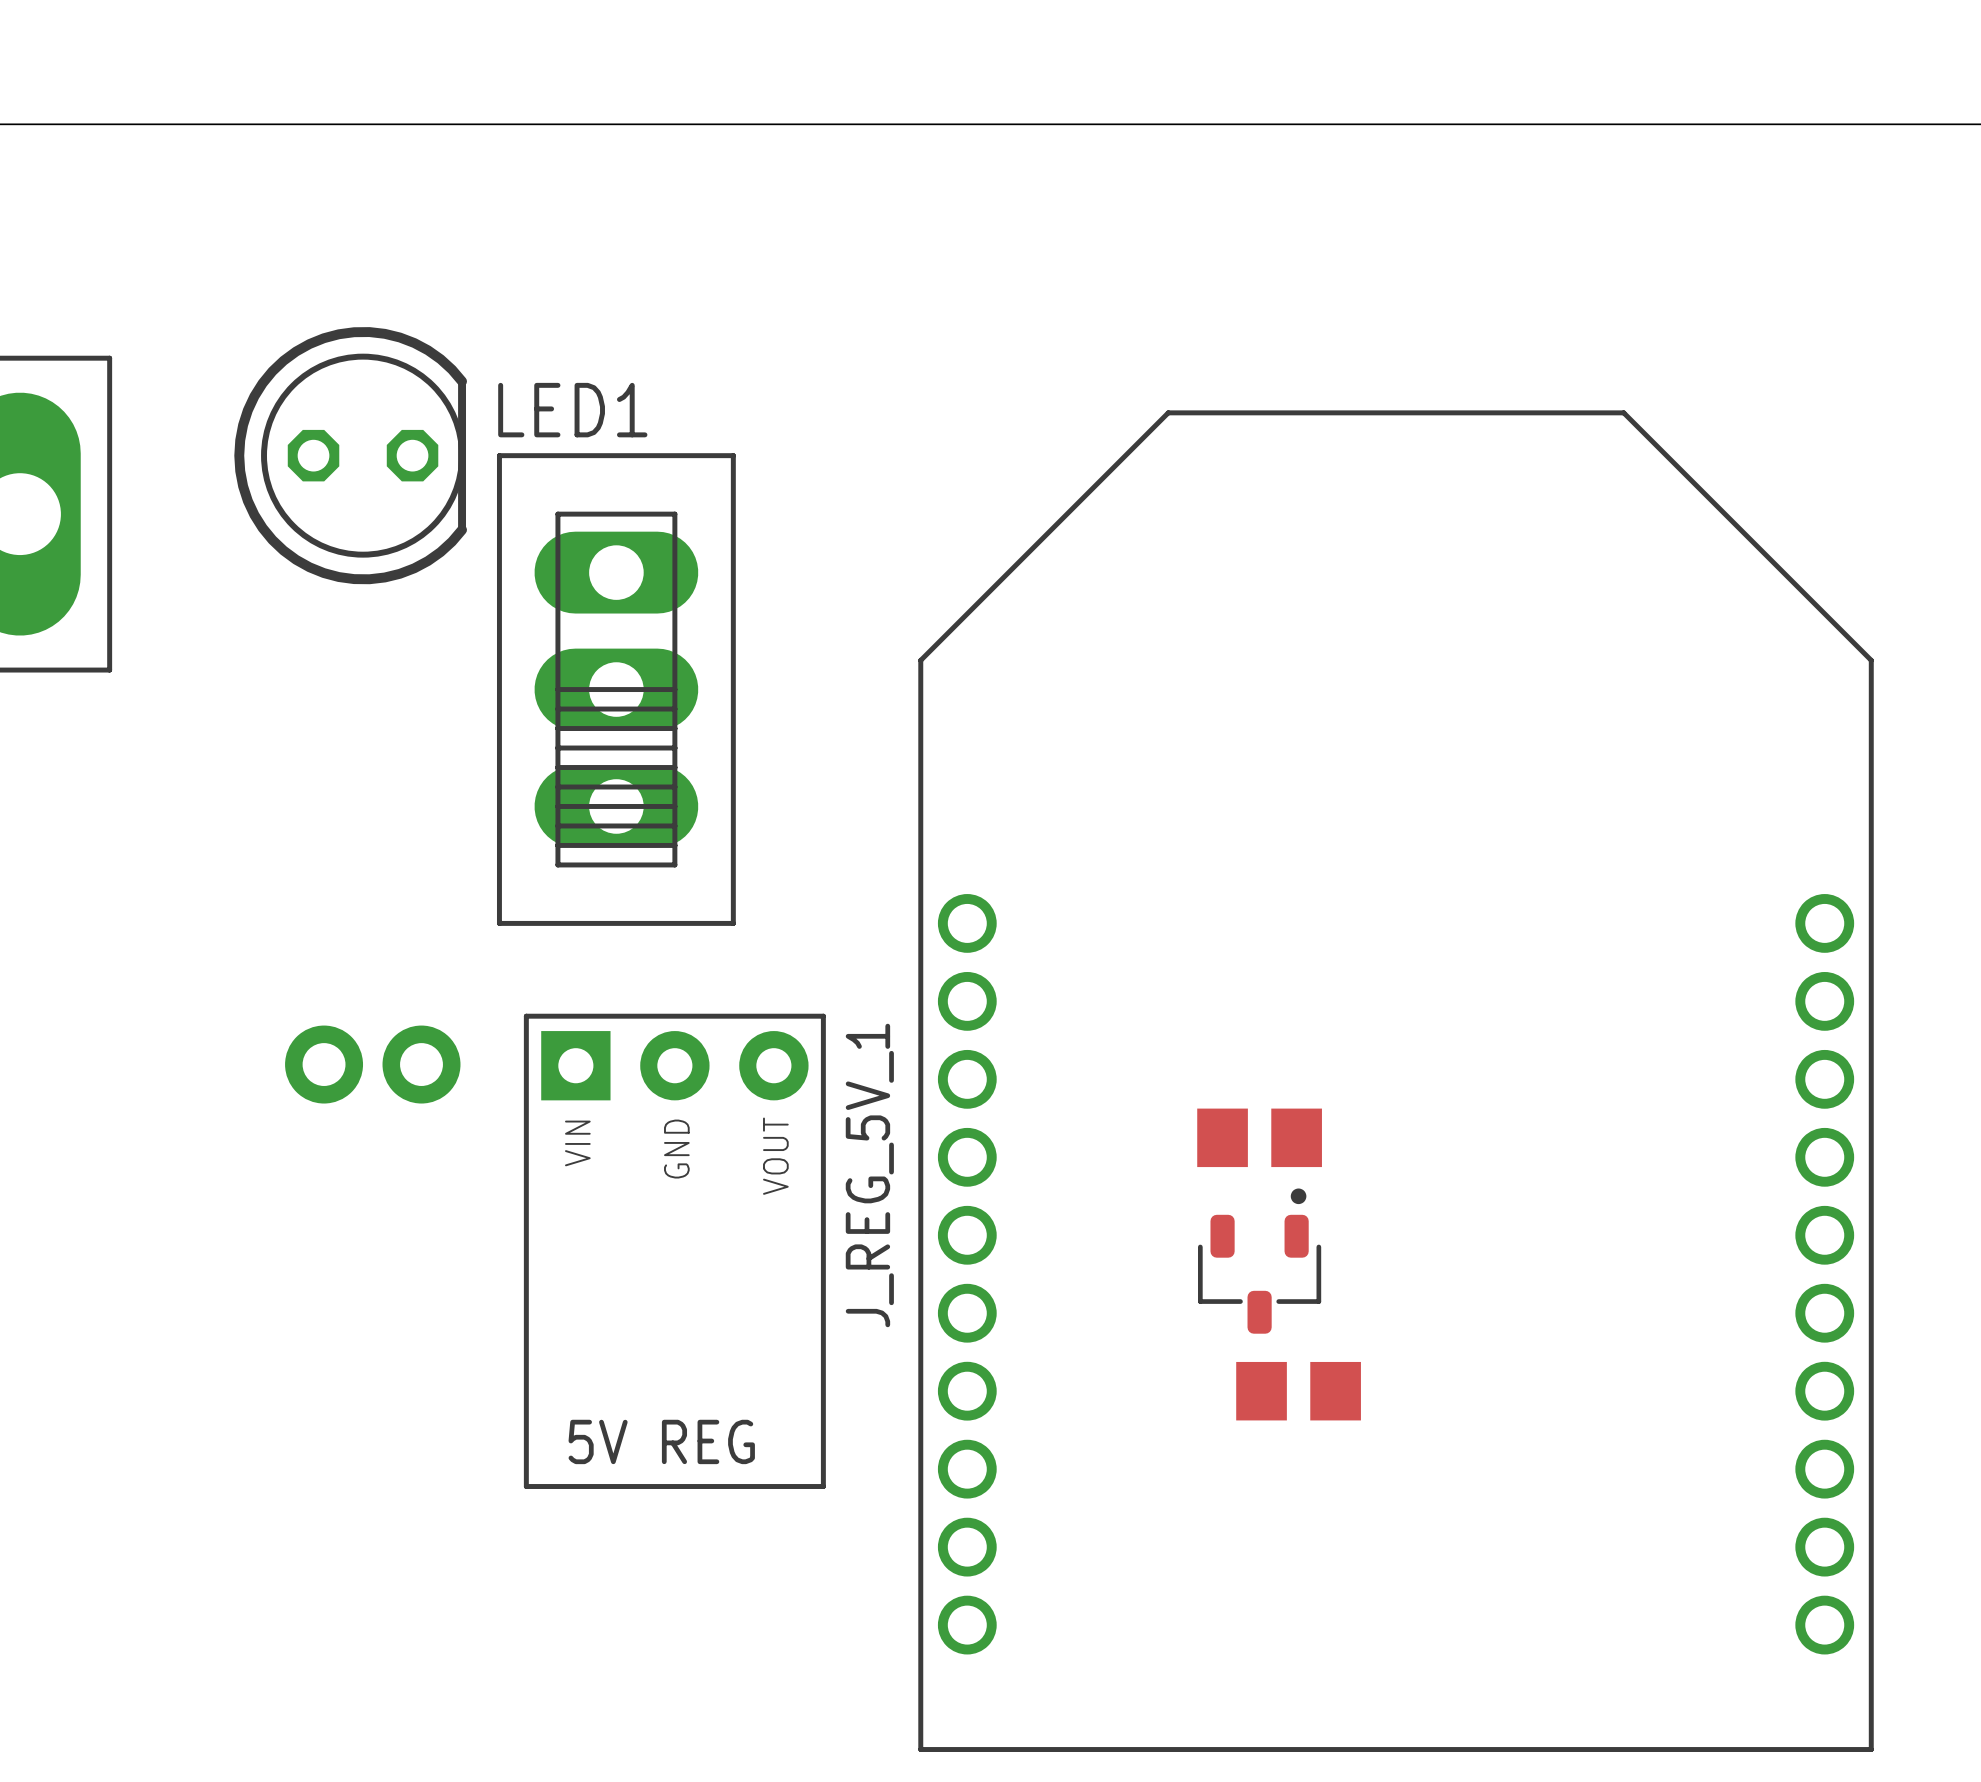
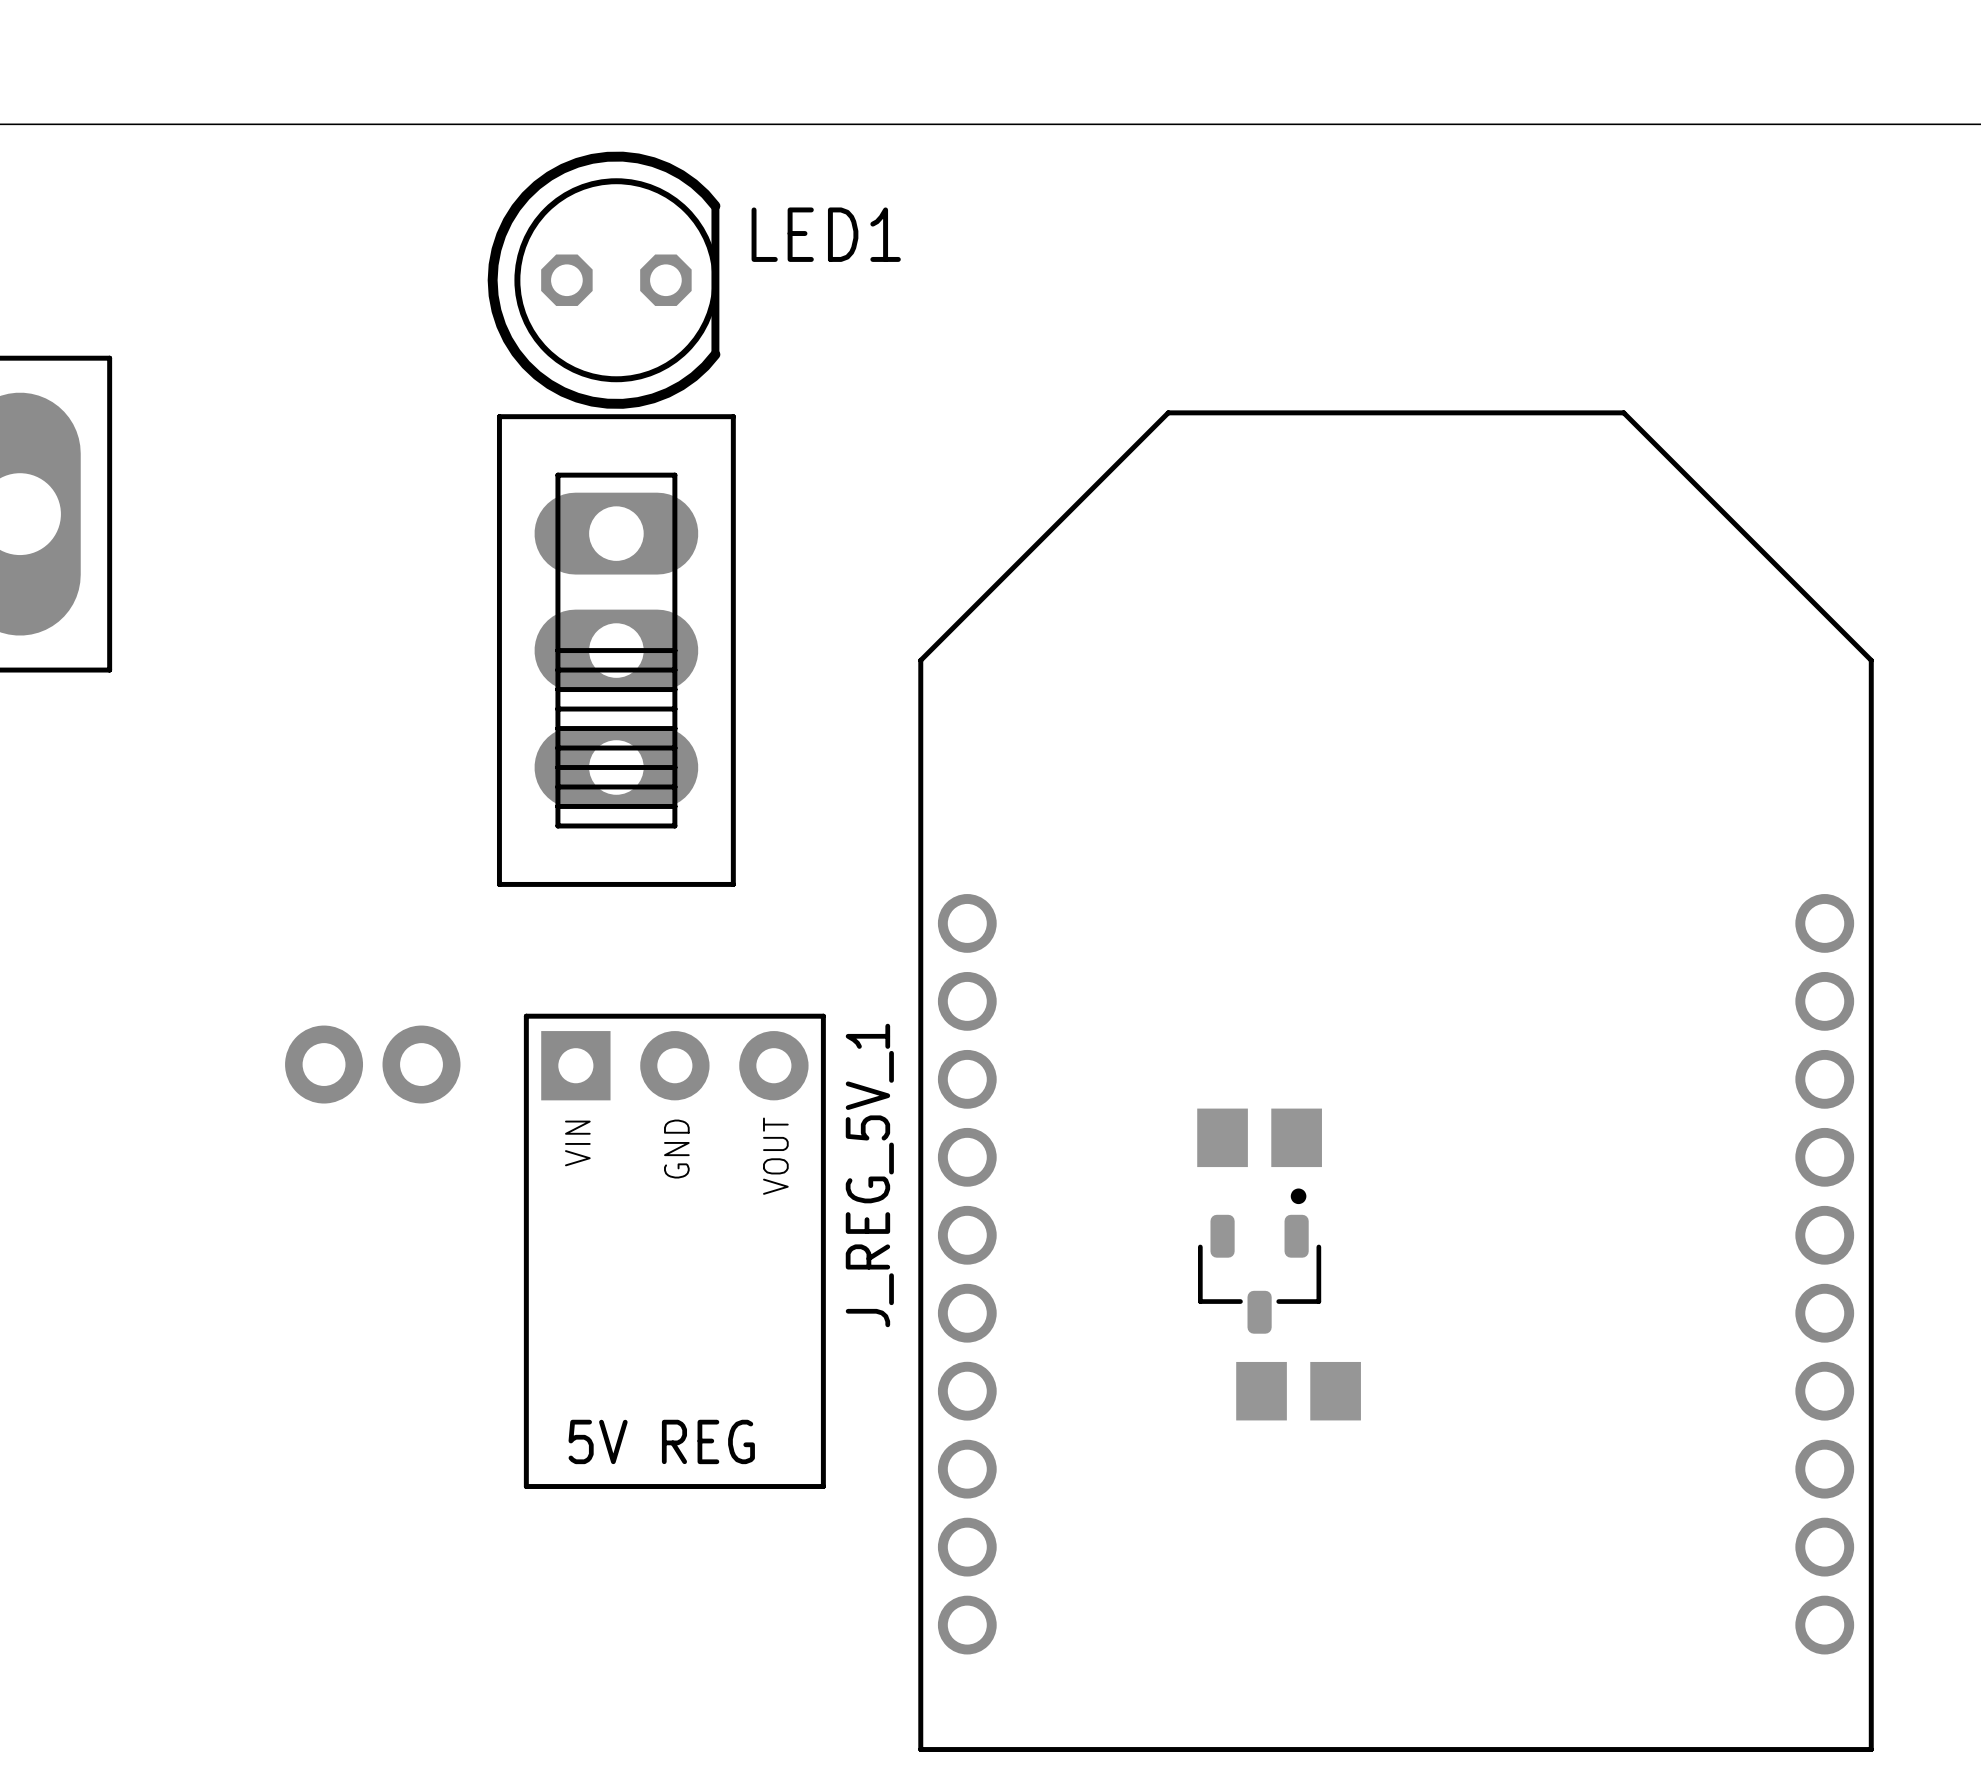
LED1 position: (350, 455) -> (604, 280)
part position: (616, 689) -> (616, 650)

